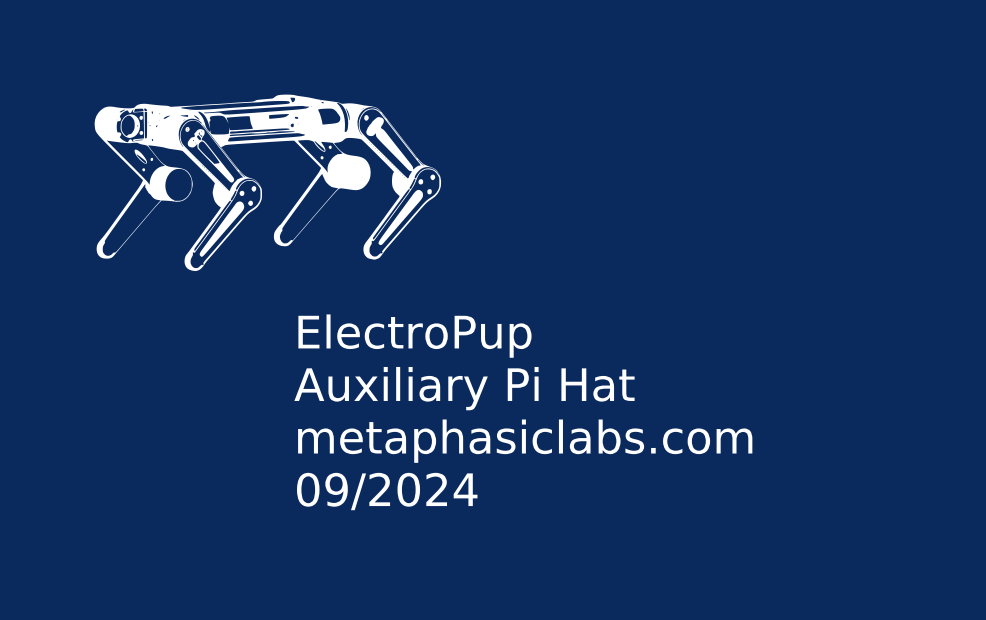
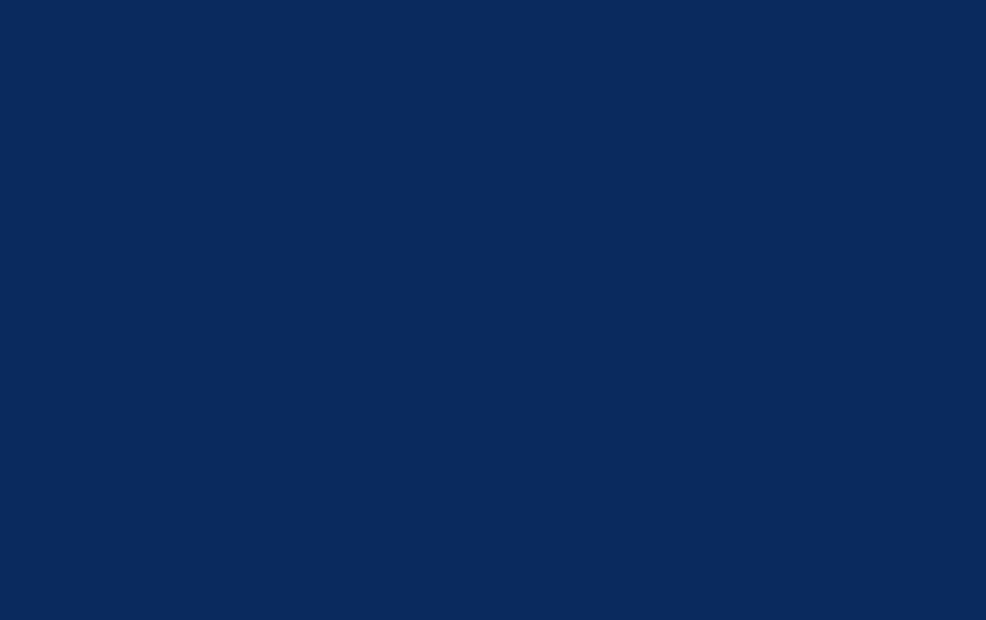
drawing: [94, 94, 442, 272] -> none
text: ElectroPup (414, 336) -> none
text: Auxiliary Pi Hat (464, 388) -> none
text: metaphasiclabs.com (525, 441) -> none
text: 09/2024 (387, 491) -> none

